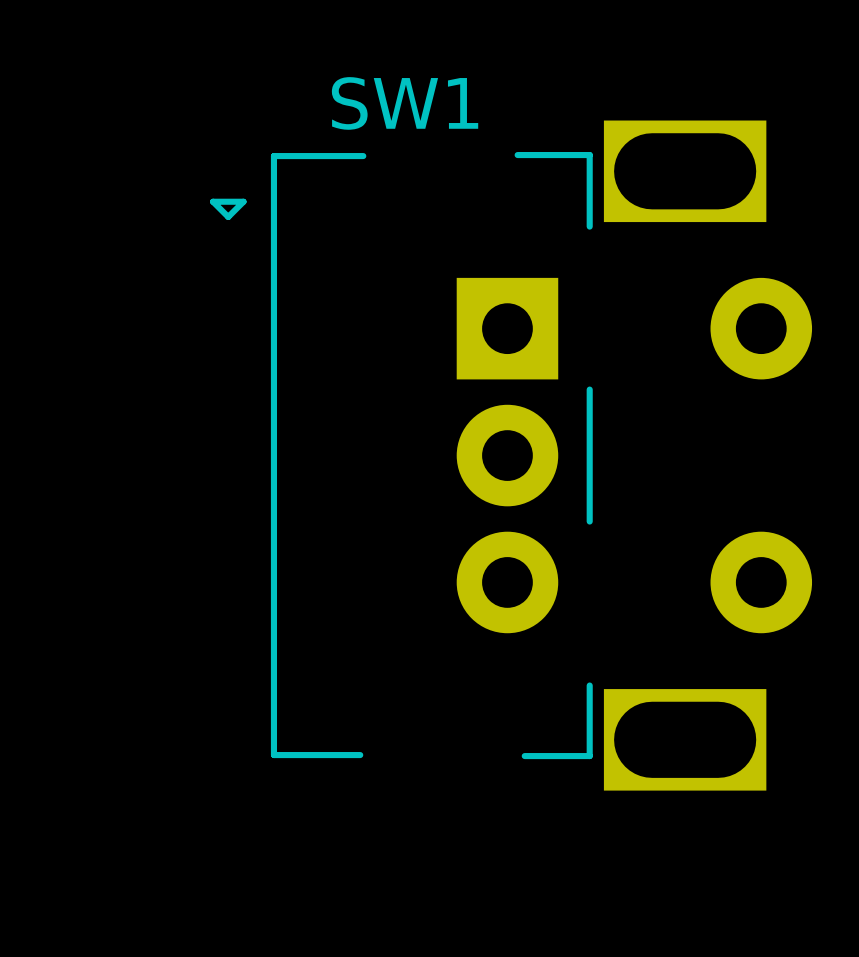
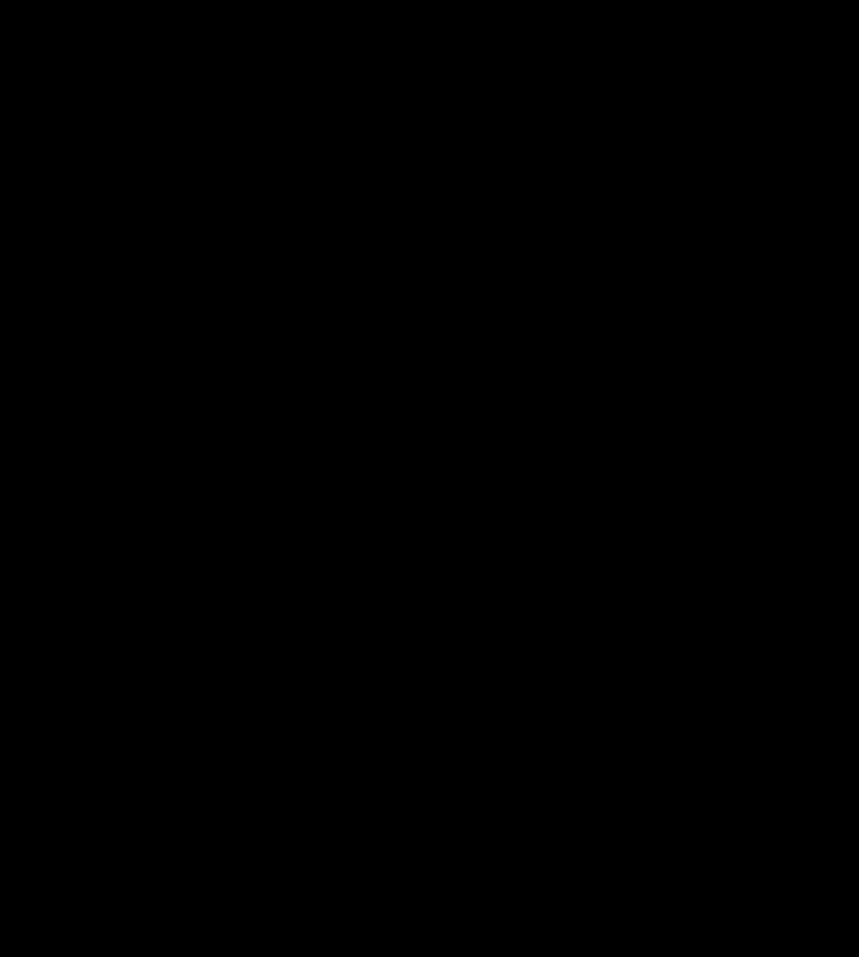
SW1: (511, 455) -> none

